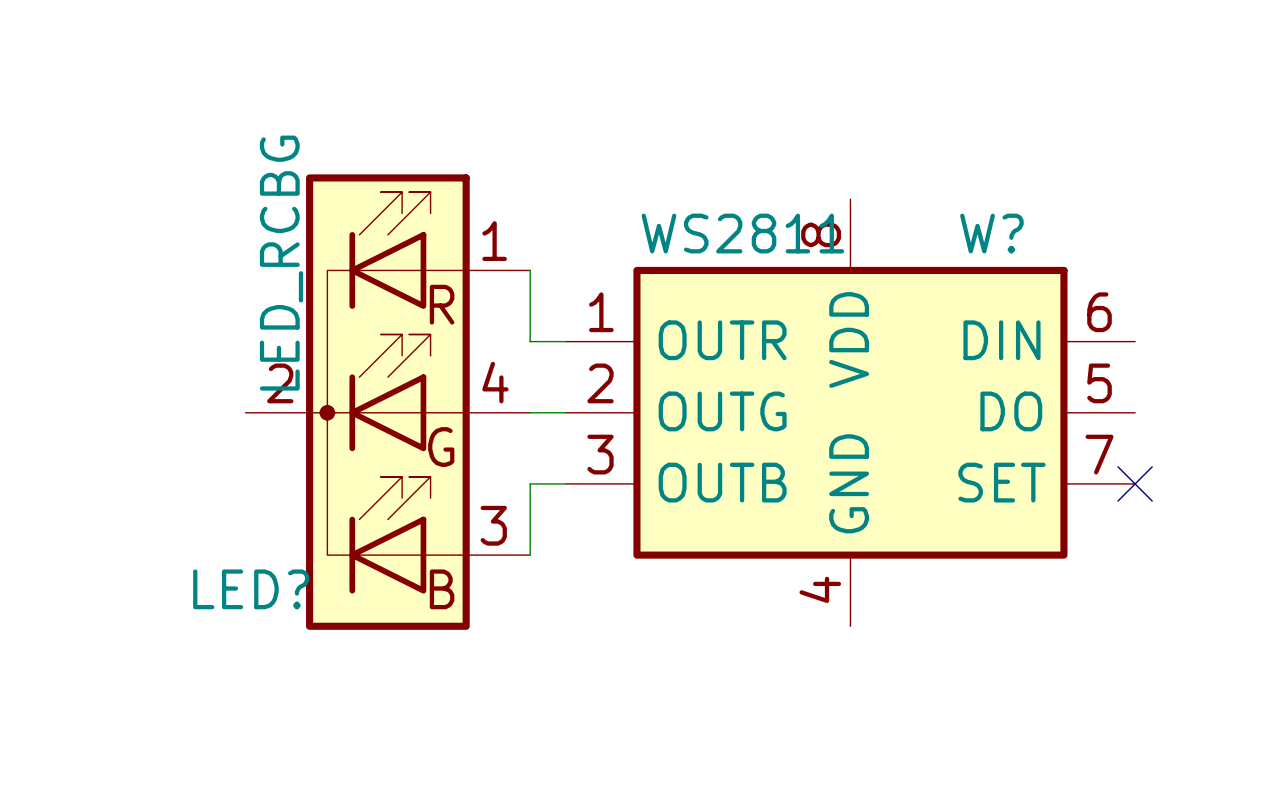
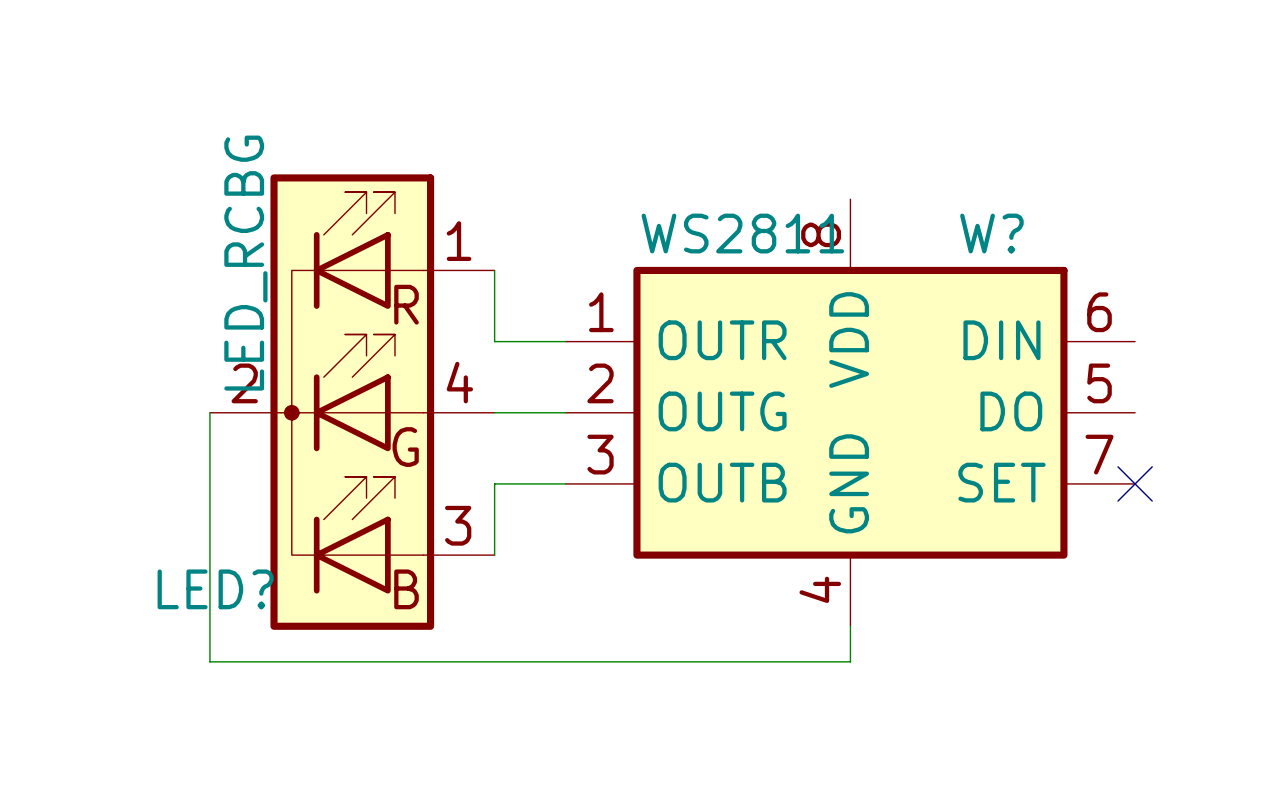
wire: (530, 270) (530, 341) -> (494, 270) (494, 341) (530, 341)
LED? position: (387, 402) -> (352, 402)
wire: none -> (209, 412) (209, 661) (850, 661) (850, 626)
wire: (530, 483) (530, 555) -> (530, 483) (494, 483) (494, 555)

